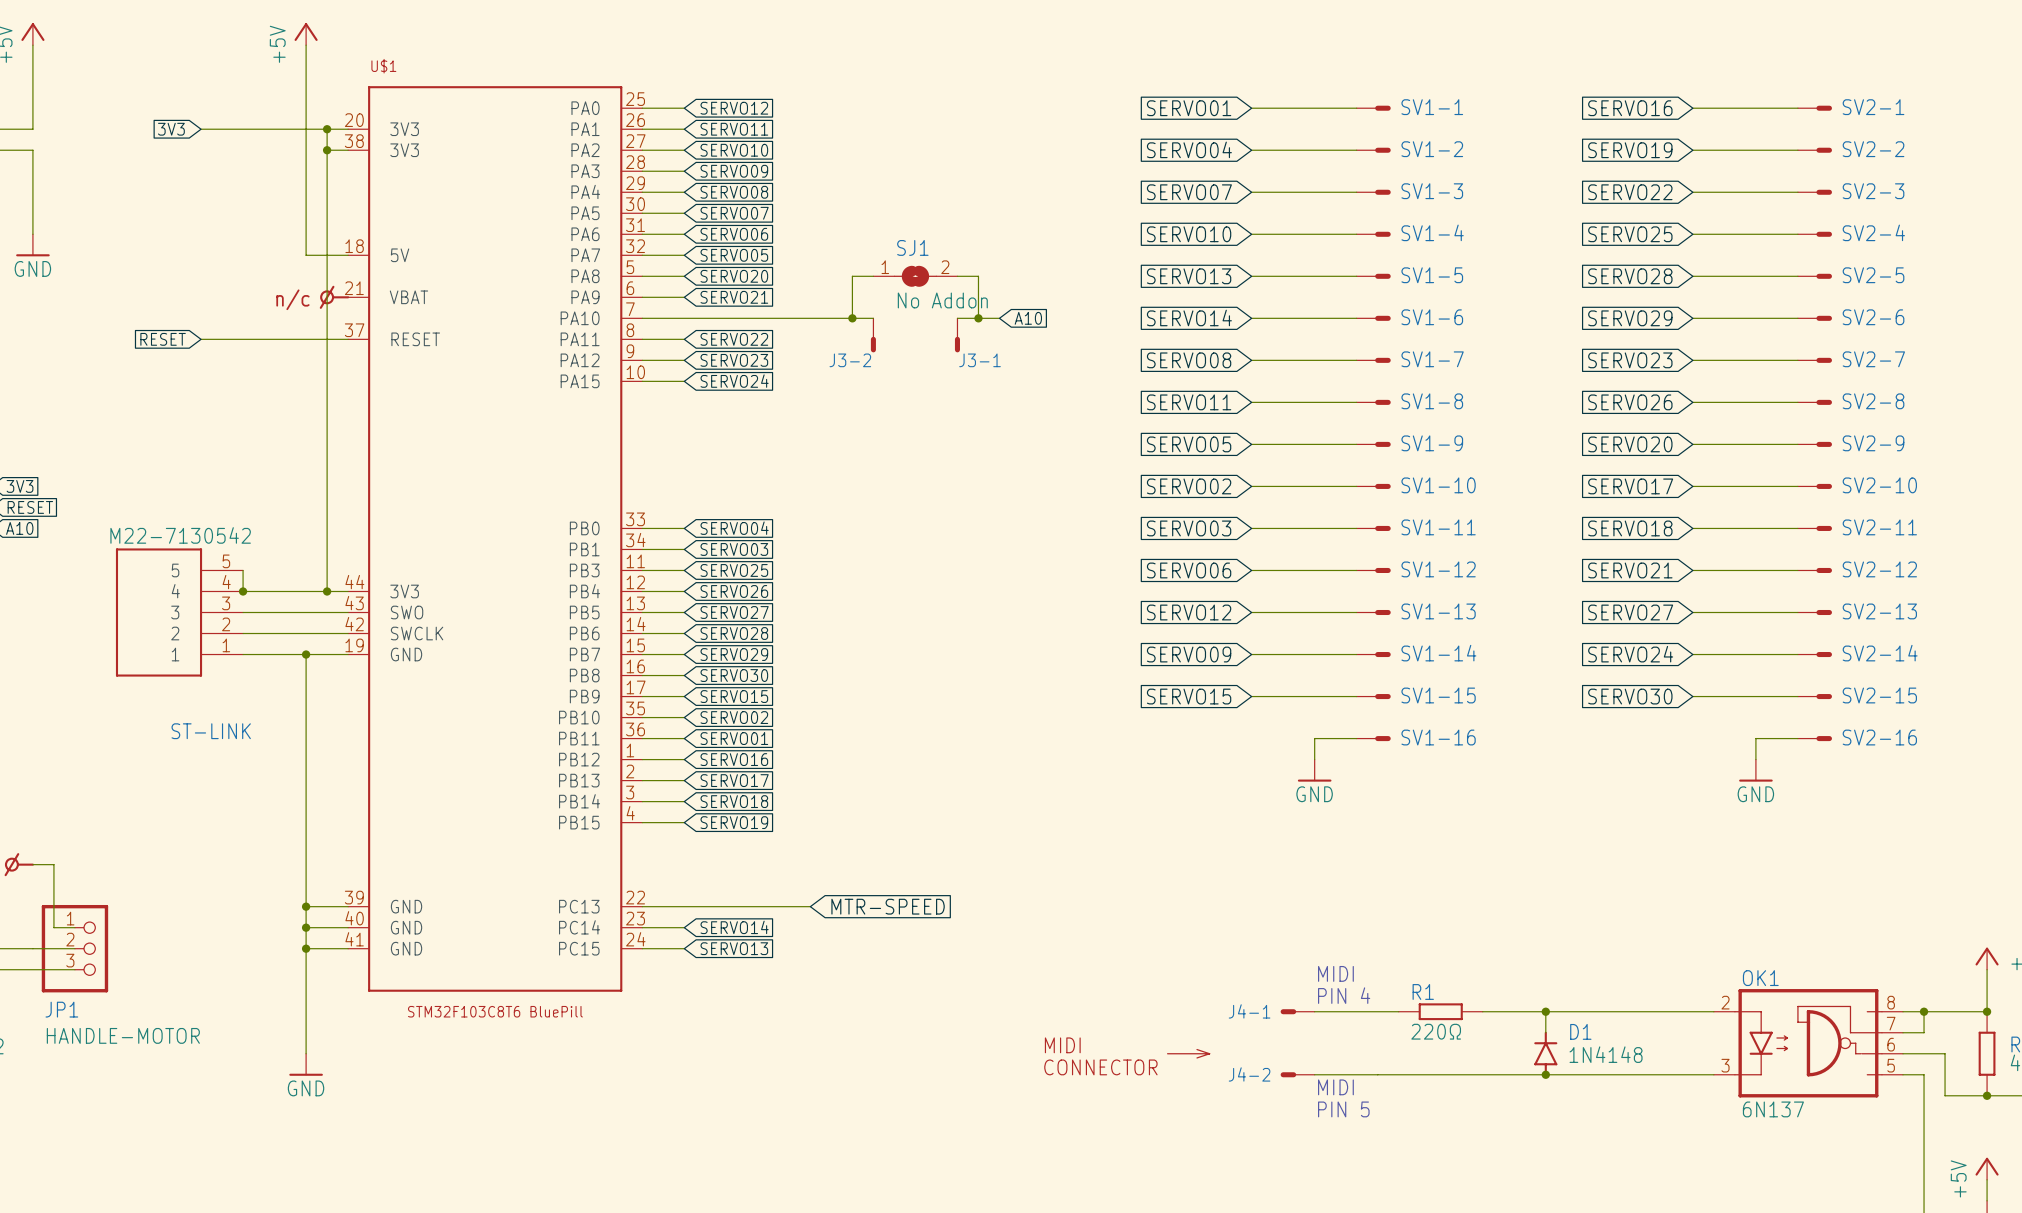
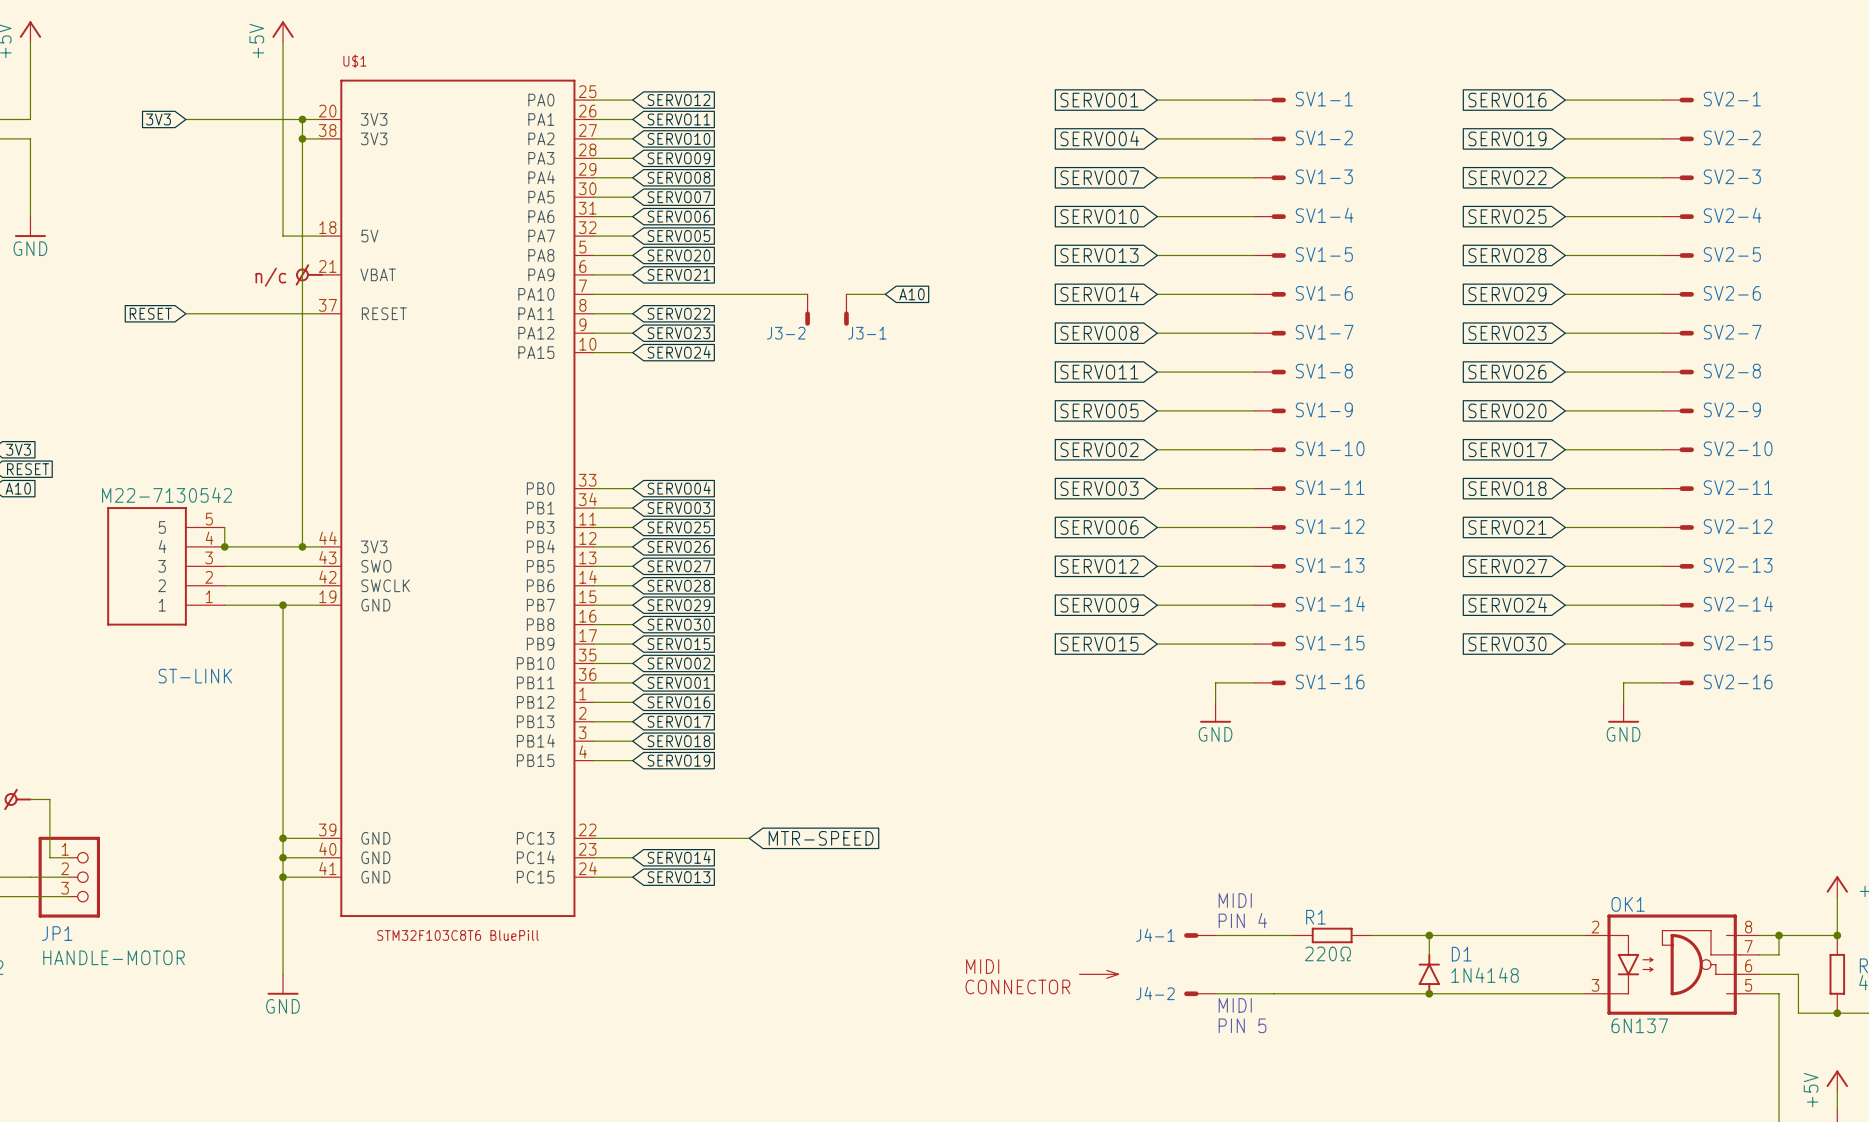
wire: (873, 276) (852, 276) (852, 318) -> none
SJ1: No Addon (915, 276) -> none
wire: (957, 276) (978, 276) (978, 318) -> none
junction: (852, 318) -> none
wire: (957, 318) (999, 318) -> (885, 294) (846, 294)
junction: (978, 318) -> none
global label position: A10 (1028, 318) -> A10 (911, 294)
J3-1 position: (957, 335) -> (846, 310)

